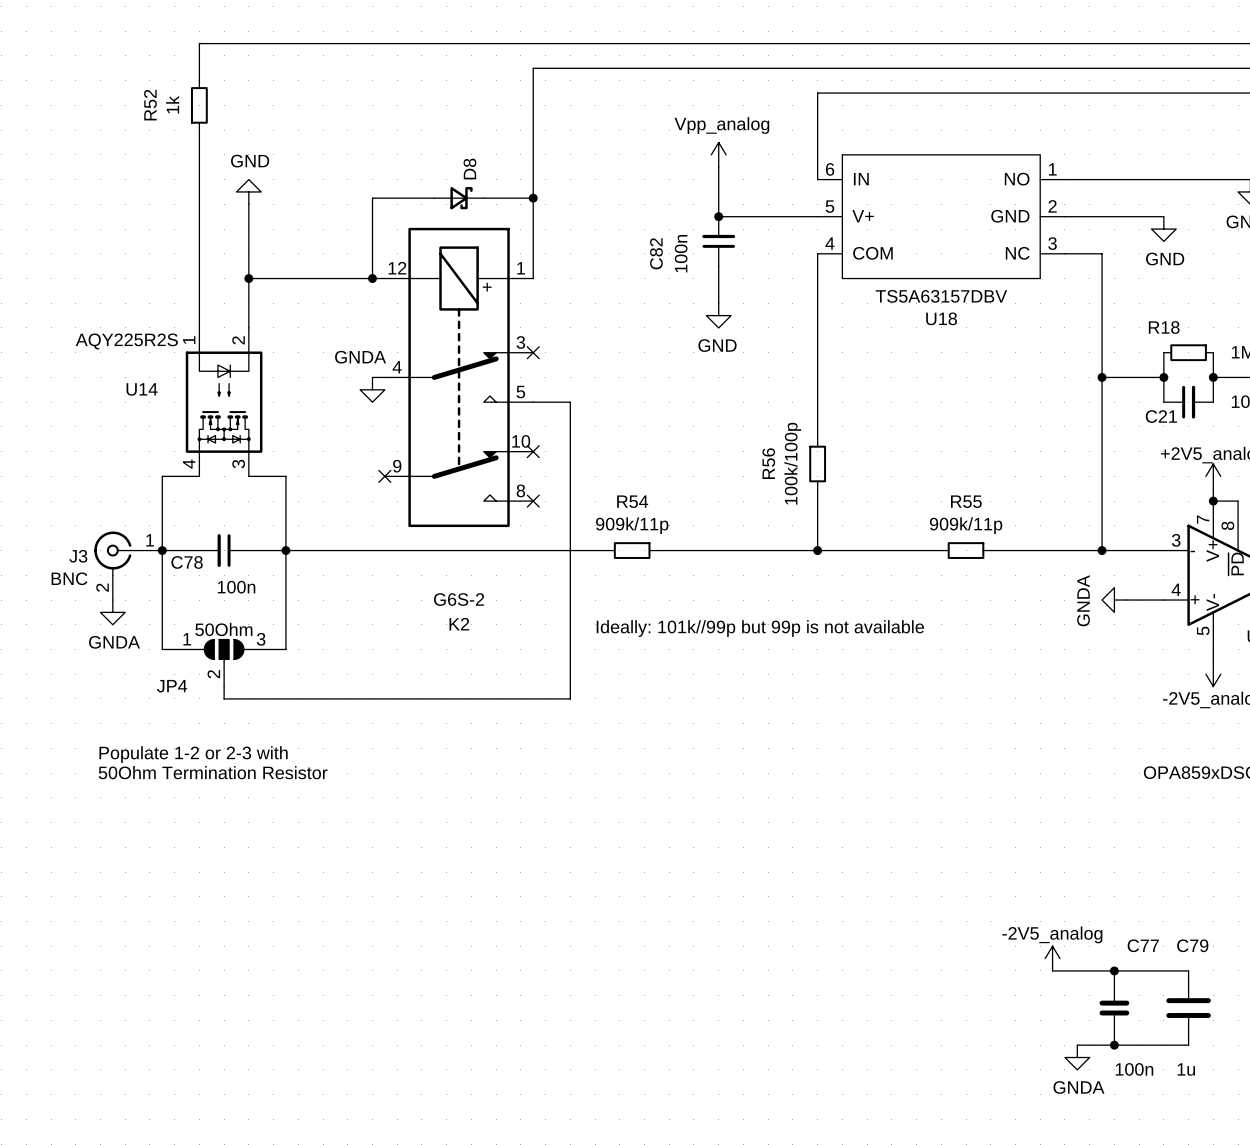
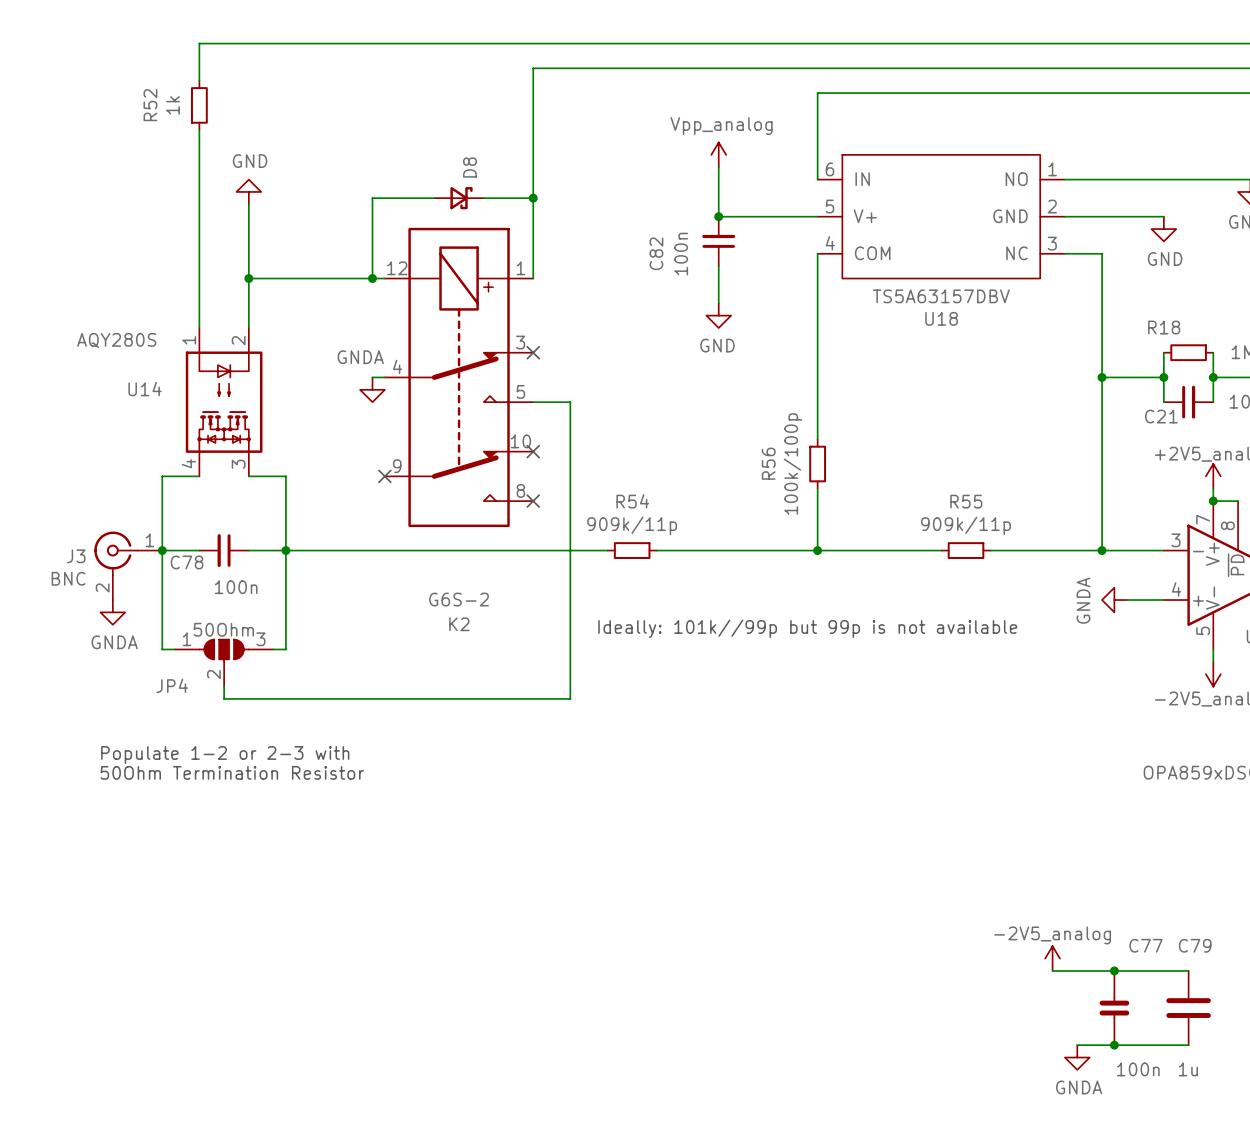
U14 value: AQY225R2S (126, 341) -> AQY280S (116, 340)

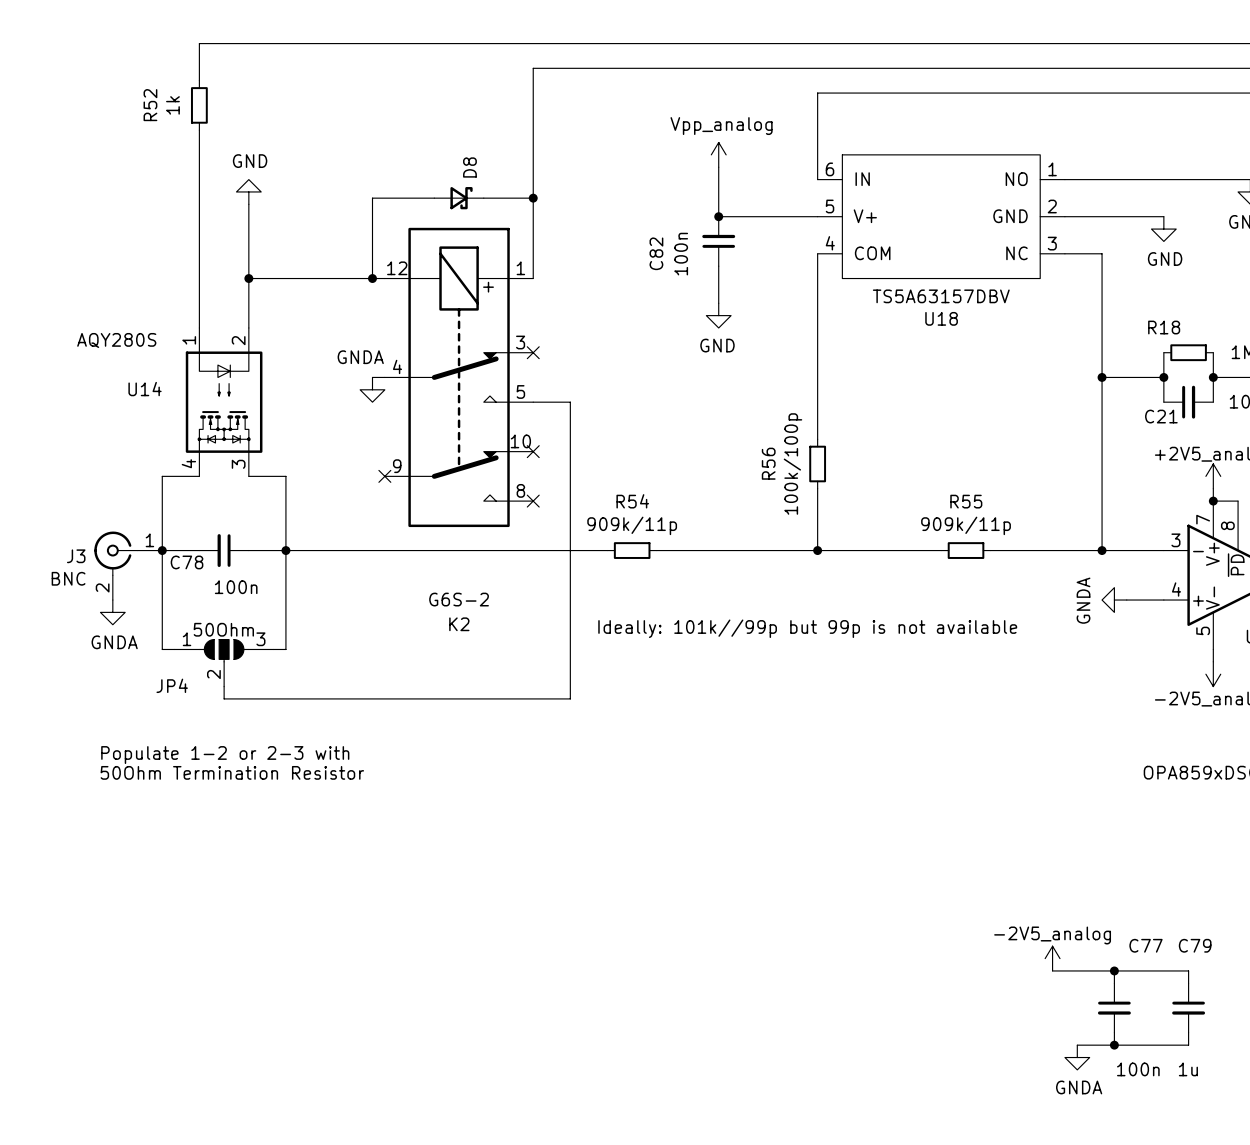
C77 symbol: [1099, 970, 1130, 1046] -> [1097, 983, 1131, 1033]
C79 symbol: [1166, 970, 1211, 1046] -> [1172, 983, 1206, 1033]

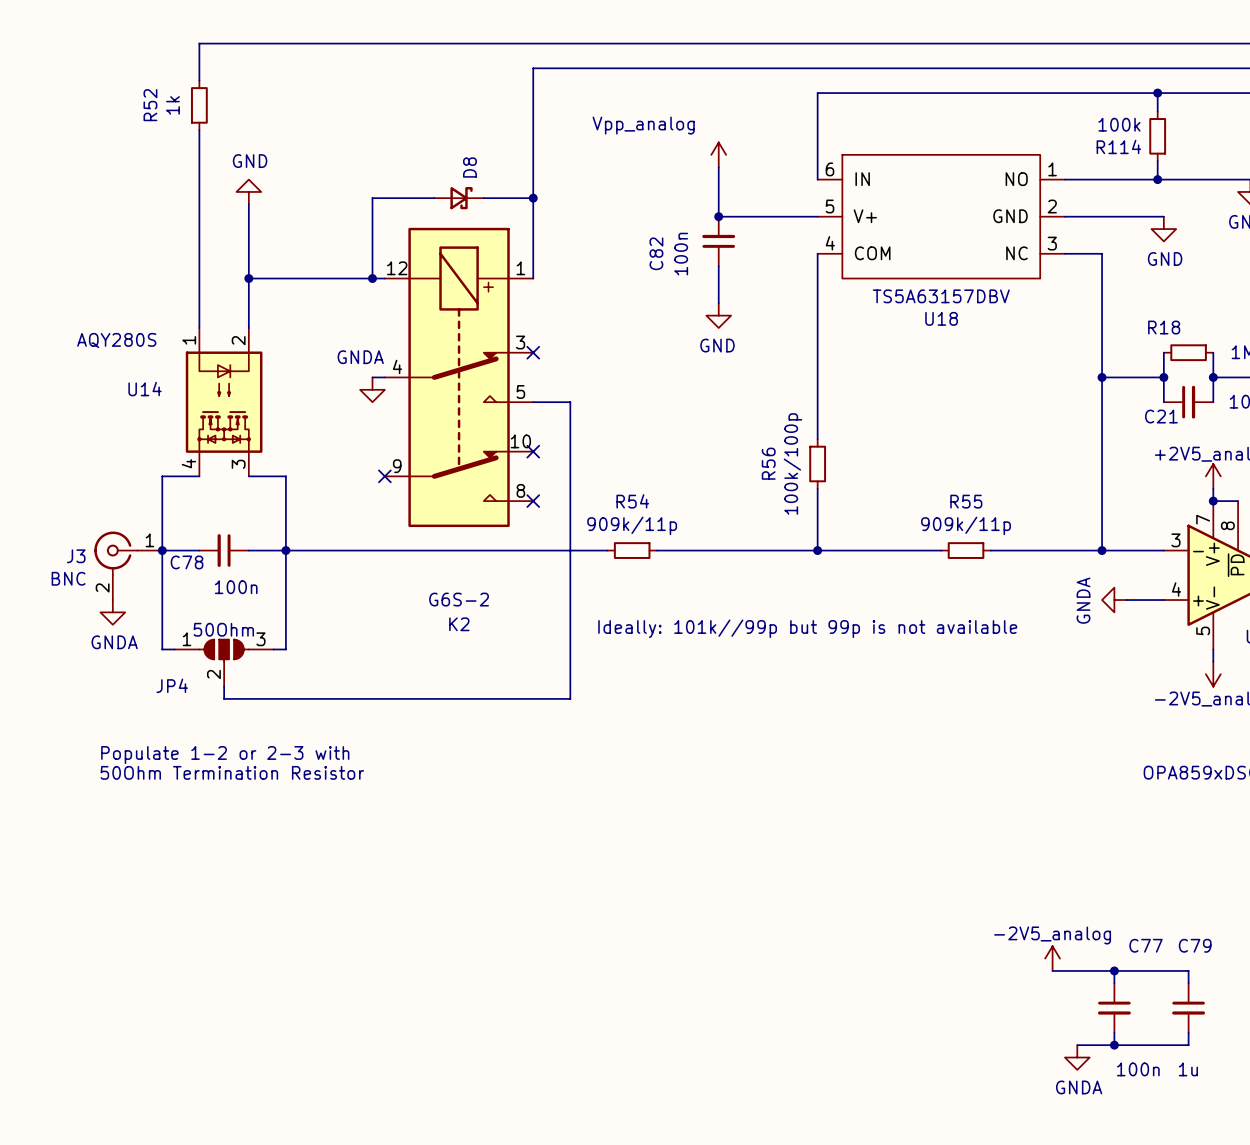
wire: none -> (1157, 93) (1157, 111)
junction: none -> (1157, 93)
power symbol text position: Vpp_analog (721, 126) -> Vpp_analog (643, 125)
R114: none -> 100k (1157, 136)
wire: none -> (1157, 161) (1157, 179)
junction: none -> (1157, 179)

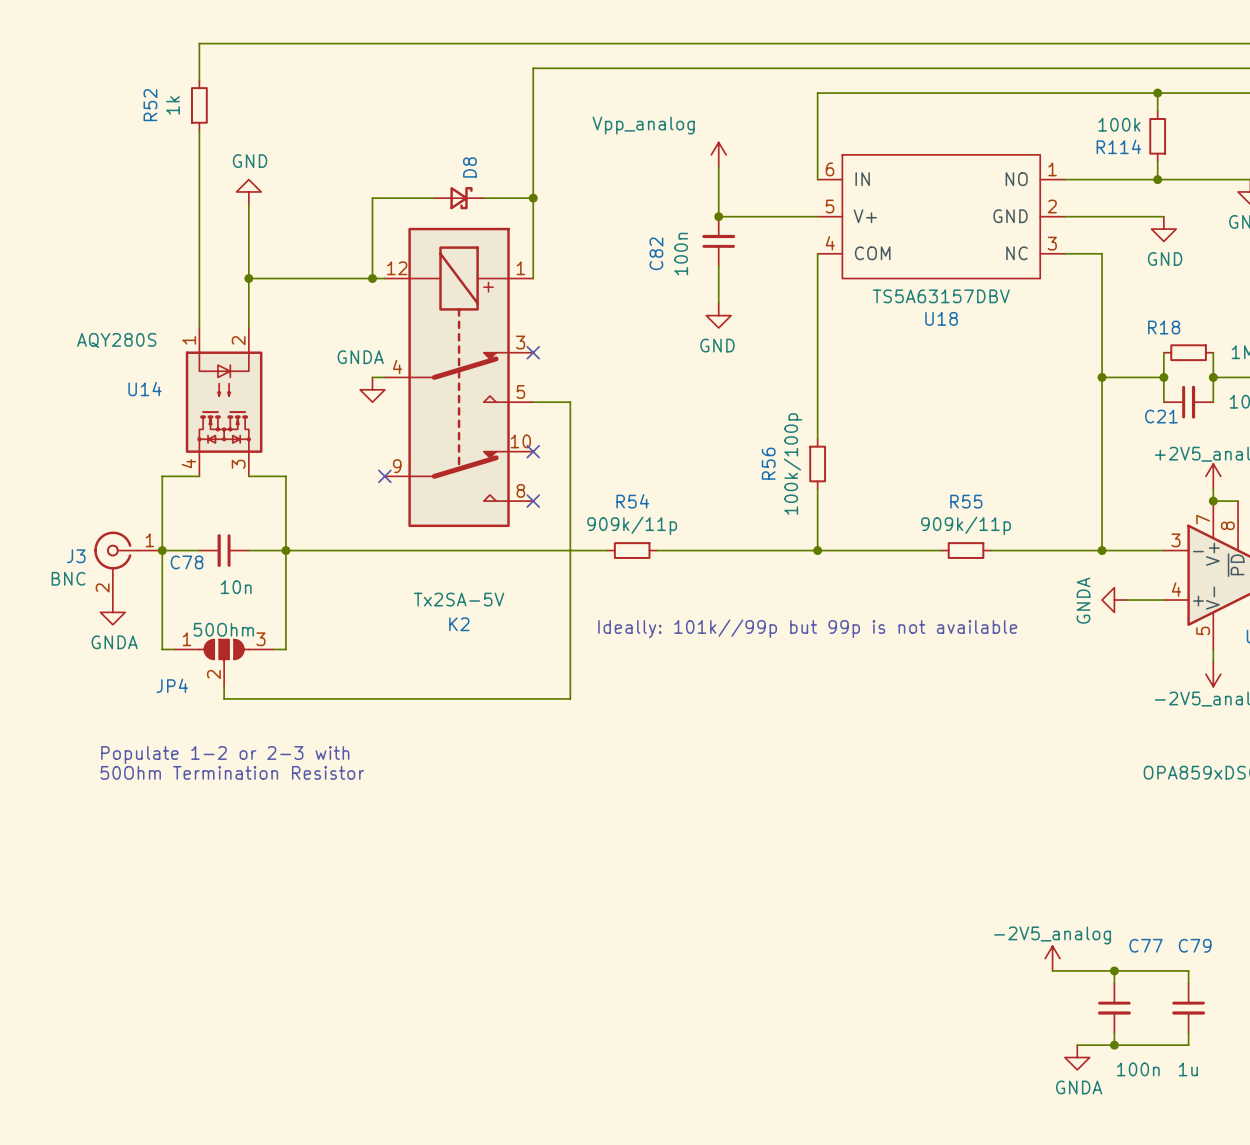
C78 value: 100n (236, 587) -> 10n (236, 587)
K2 value: G6S-2 (459, 599) -> Tx2SA-5V (459, 599)

